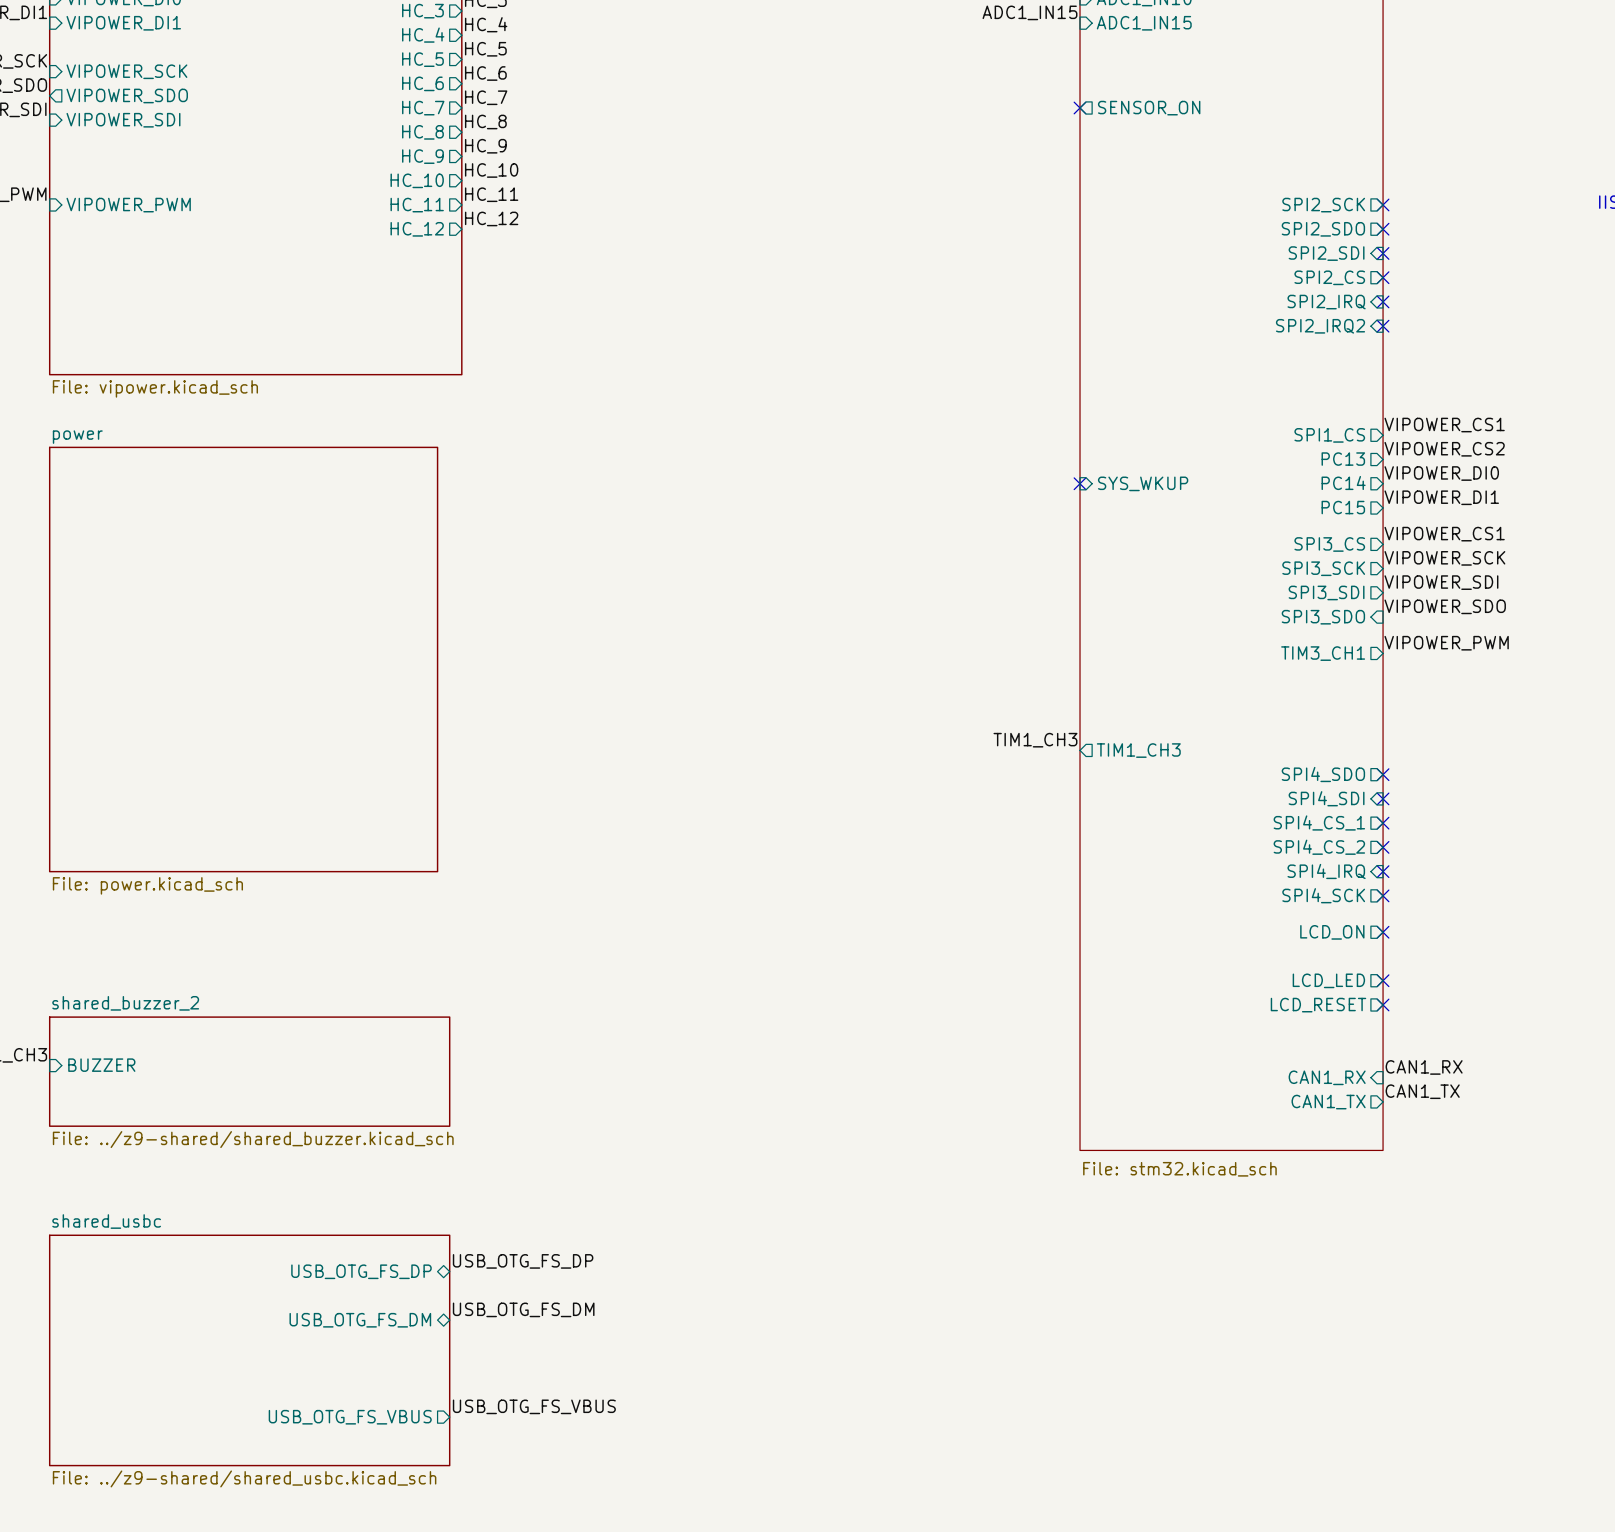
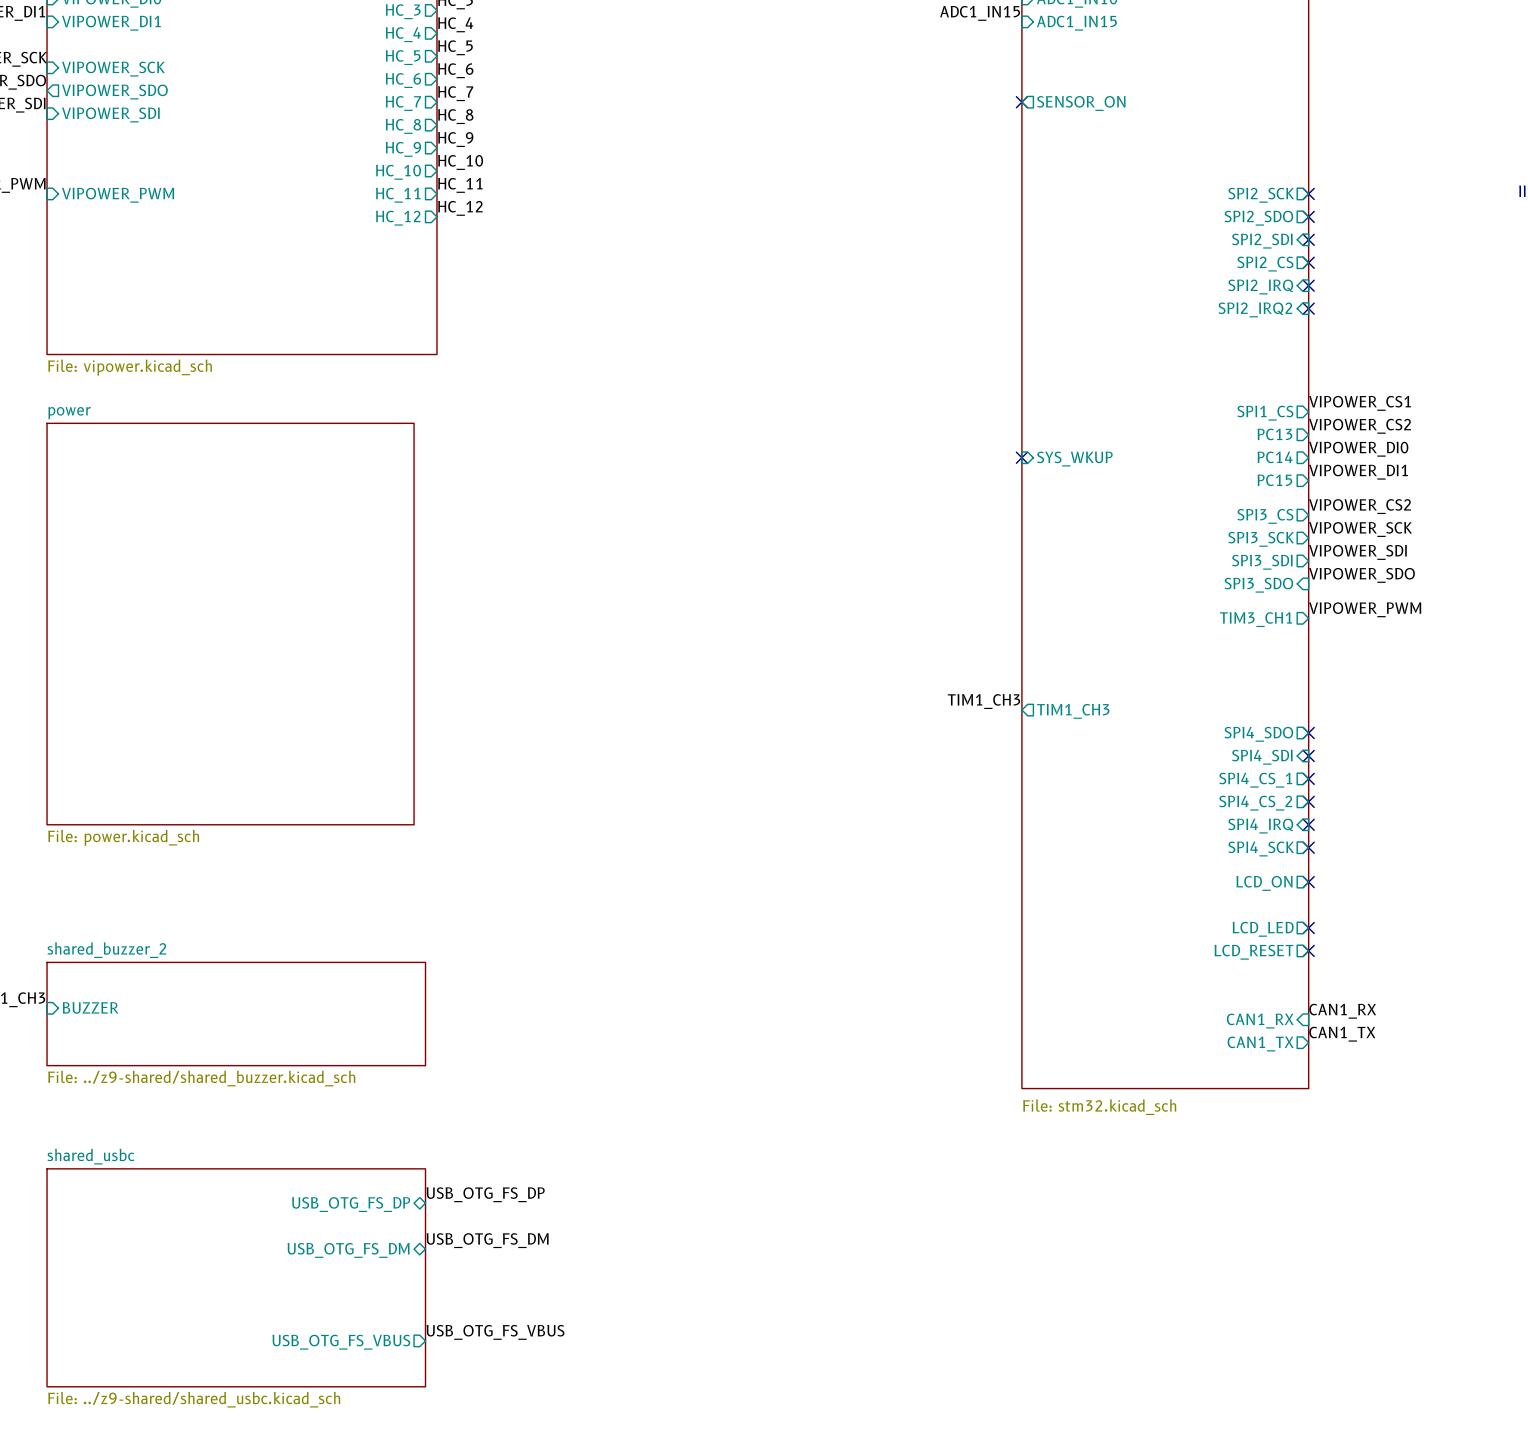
label: VIPOWER_CS1 (1444, 534) -> VIPOWER_CS2 (1360, 506)

